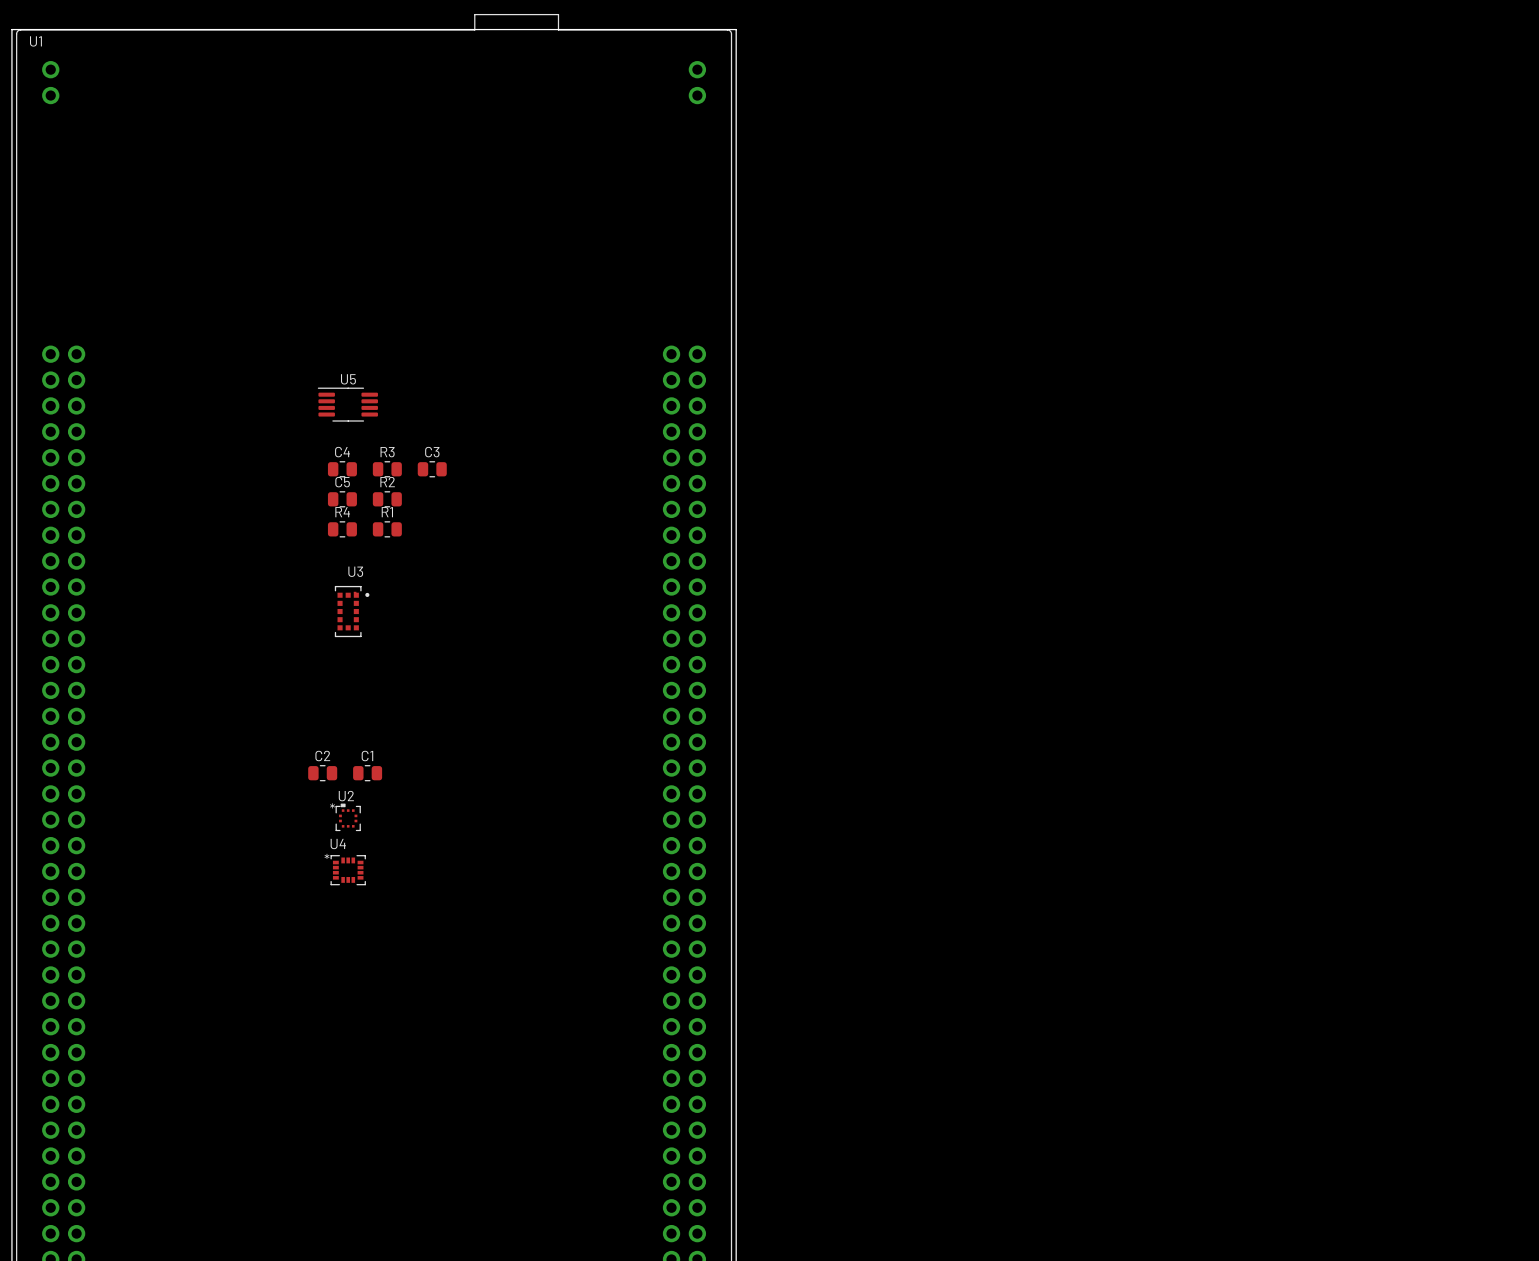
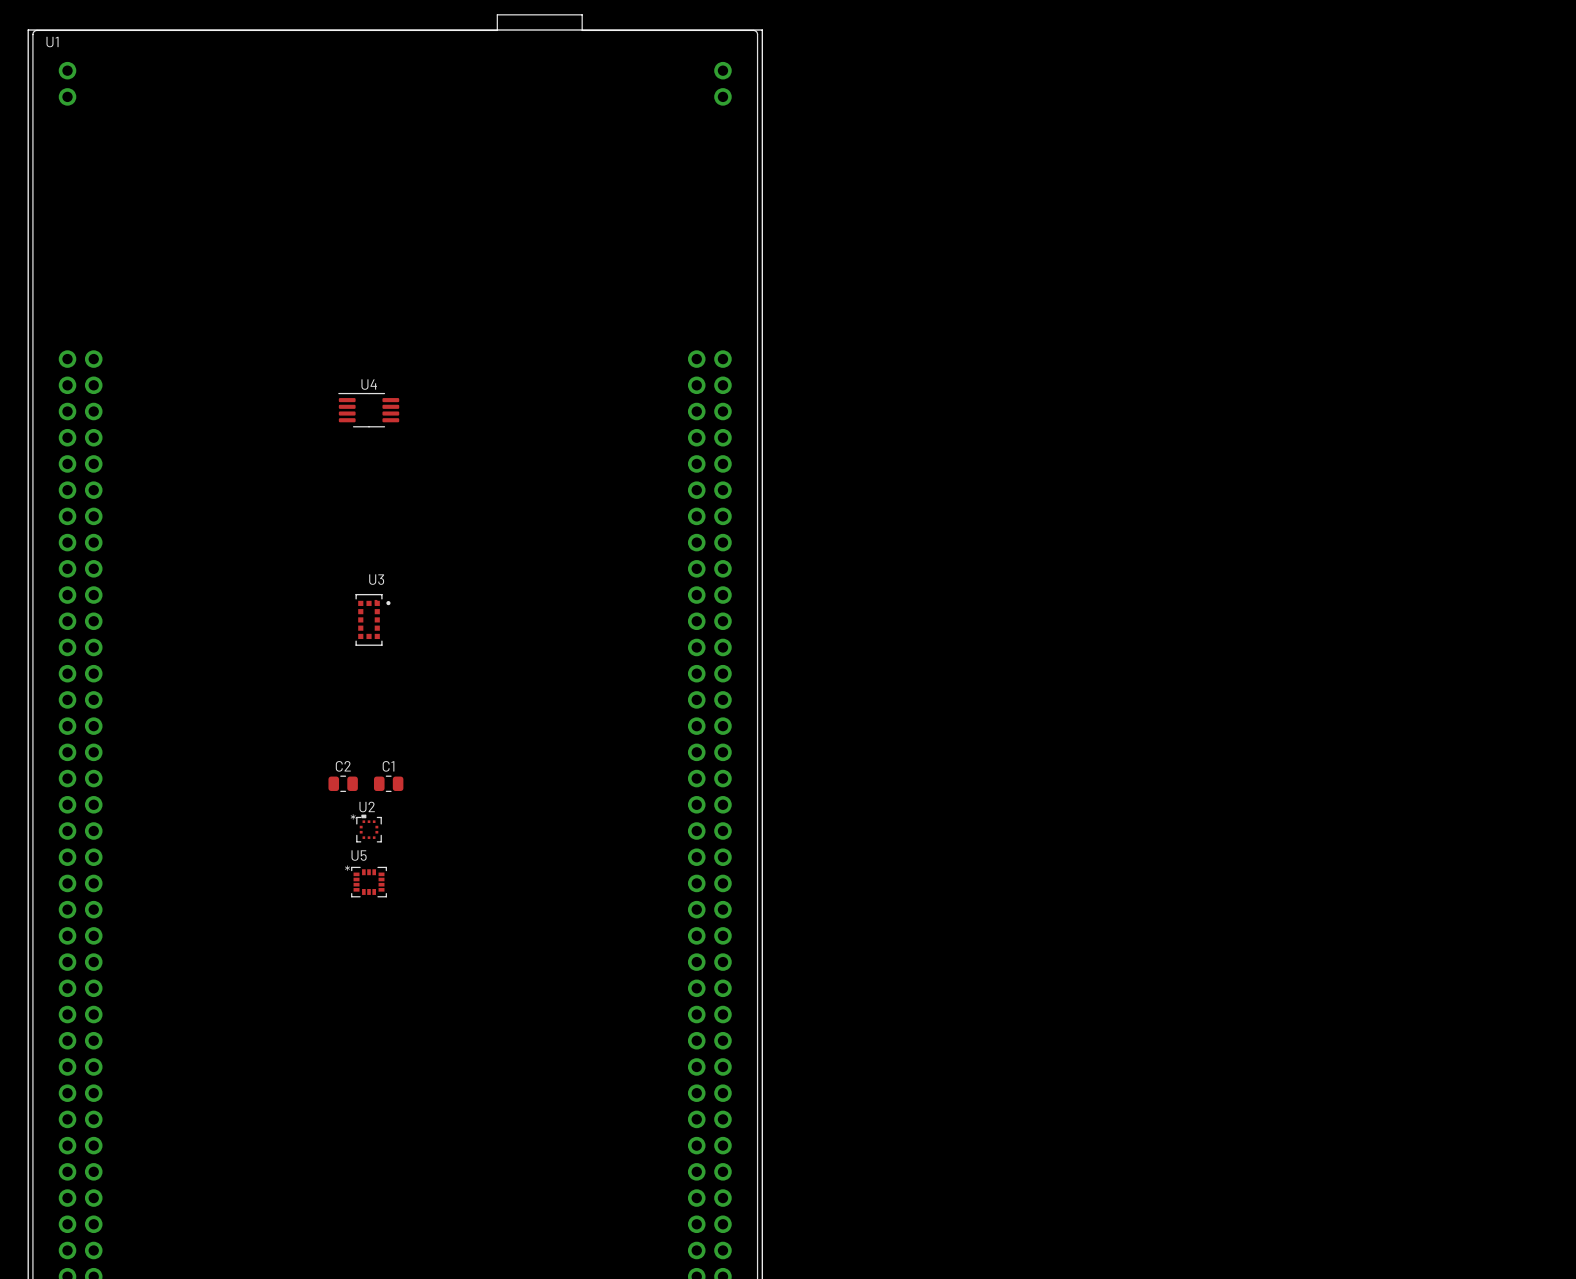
U5 name: U5 (348, 379) -> U4 (369, 384)
C4: (342, 469) -> none
R3: (387, 469) -> none
C3: (432, 469) -> none
C5: (342, 499) -> none
R2: (387, 499) -> none
R4: (342, 529) -> none
R1: (387, 529) -> none
U4 name: U4 (338, 844) -> U5 (359, 855)

